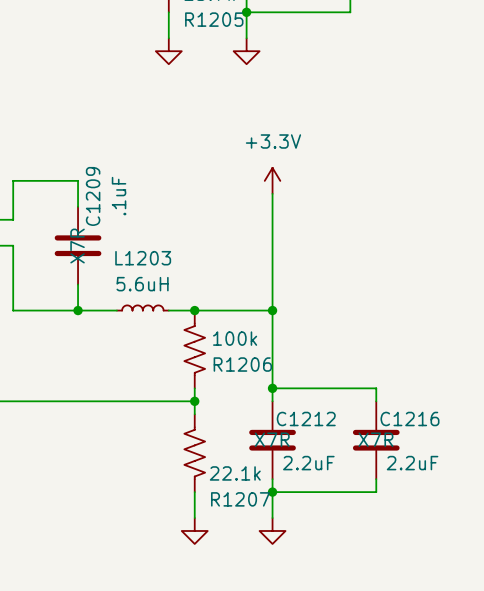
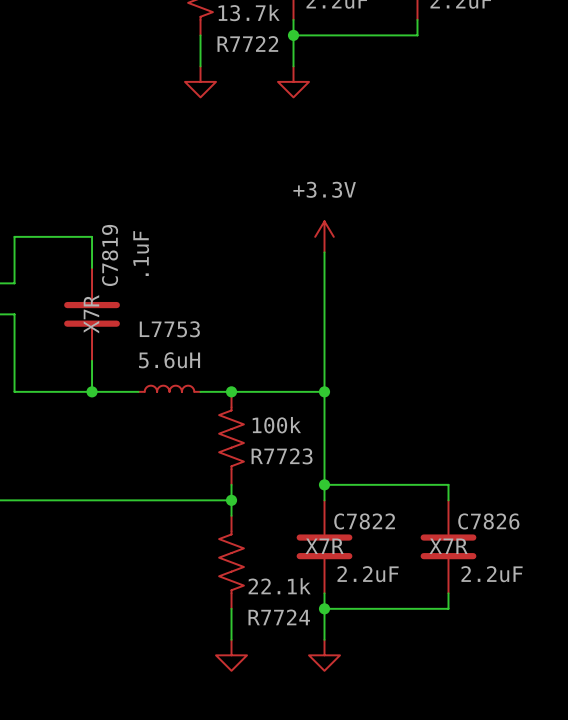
R1205 name: R1205 (214, 19) -> R7722 (247, 43)
C1209 name: C1209 (93, 196) -> C7819 (110, 255)
L1203 name: L1203 (143, 258) -> L7753 (169, 329)
R1206 name: R1206 (242, 364) -> R7723 (282, 456)
C1212 name: C1212 (306, 418) -> C7822 (364, 521)
C1216 name: C1216 (409, 418) -> C7826 (488, 521)
R1207 name: R1207 (240, 499) -> R7724 (279, 617)

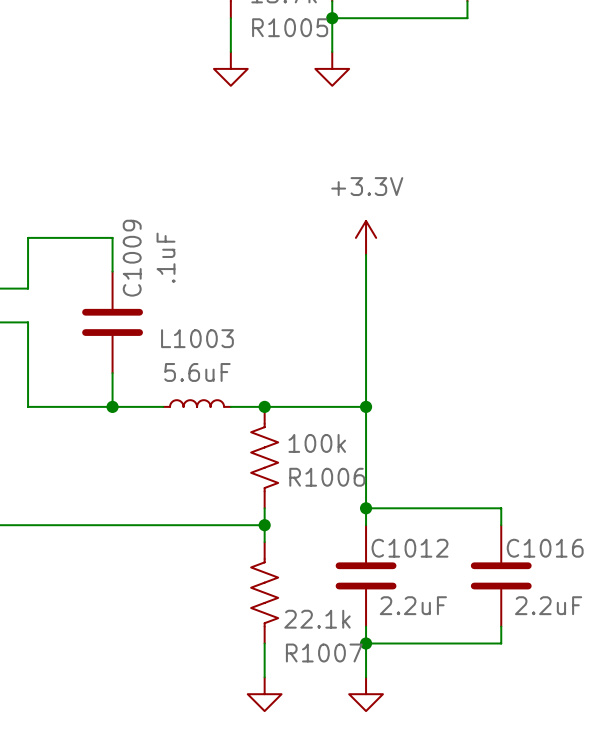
R7722 name: R7722 (247, 43) -> R1005 (290, 27)
C7819 name: C7819 (110, 255) -> C1009 (132, 258)
C7819 text: X7R (91, 314) -> none
L7753 name: L7753 (169, 329) -> L1003 (197, 338)
L7753 value: 5.6uH (169, 360) -> 5.6uF (197, 372)
R7723 name: R7723 (282, 456) -> R1006 (327, 477)
C7822 name: C7822 (364, 521) -> C1012 (409, 548)
C7826 name: C7826 (488, 521) -> C1016 (545, 548)
C7822 text: X7R (324, 546) -> none
C7826 text: X7R (448, 546) -> none
R7724 name: R7724 (279, 617) -> R1007 (324, 653)

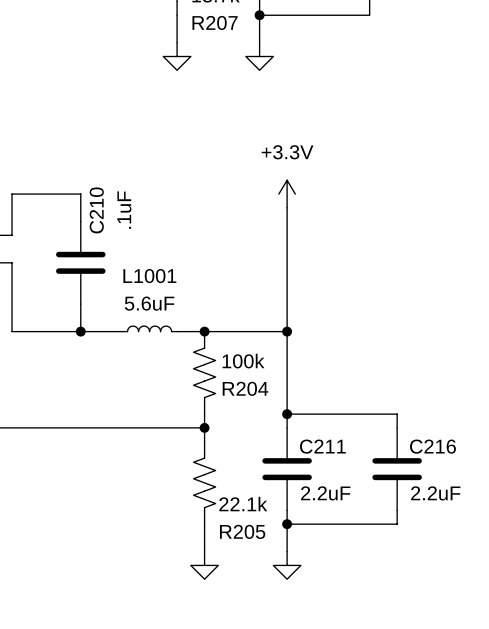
R1005 name: R1005 (290, 27) -> R207 (215, 22)
C1009 name: C1009 (132, 258) -> C210 (96, 210)
L1003 name: L1003 (197, 338) -> L1001 (149, 276)
R1006 name: R1006 (327, 477) -> R204 (245, 388)
C1012 name: C1012 (409, 548) -> C211 (322, 446)
C1016 name: C1016 (545, 548) -> C216 (432, 446)
R1007 name: R1007 (324, 653) -> R205 (242, 531)

